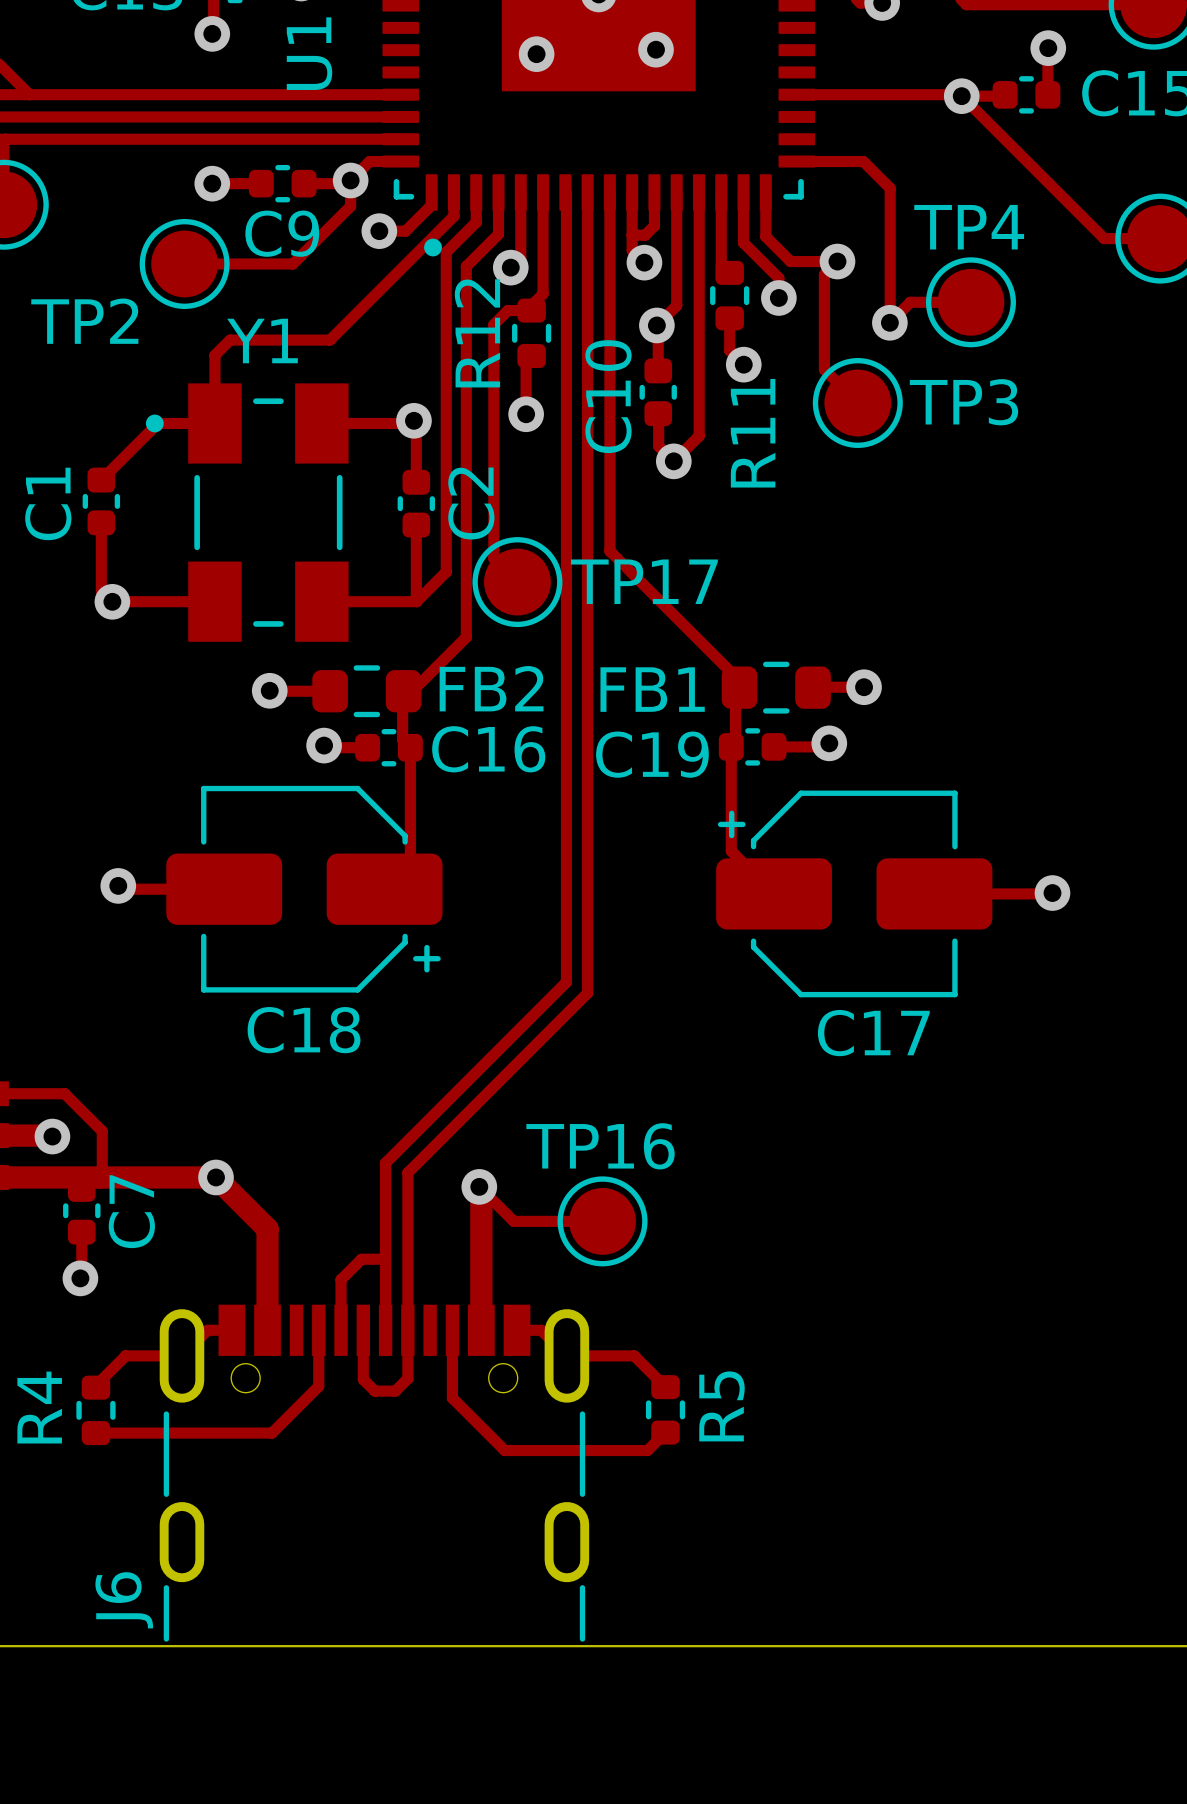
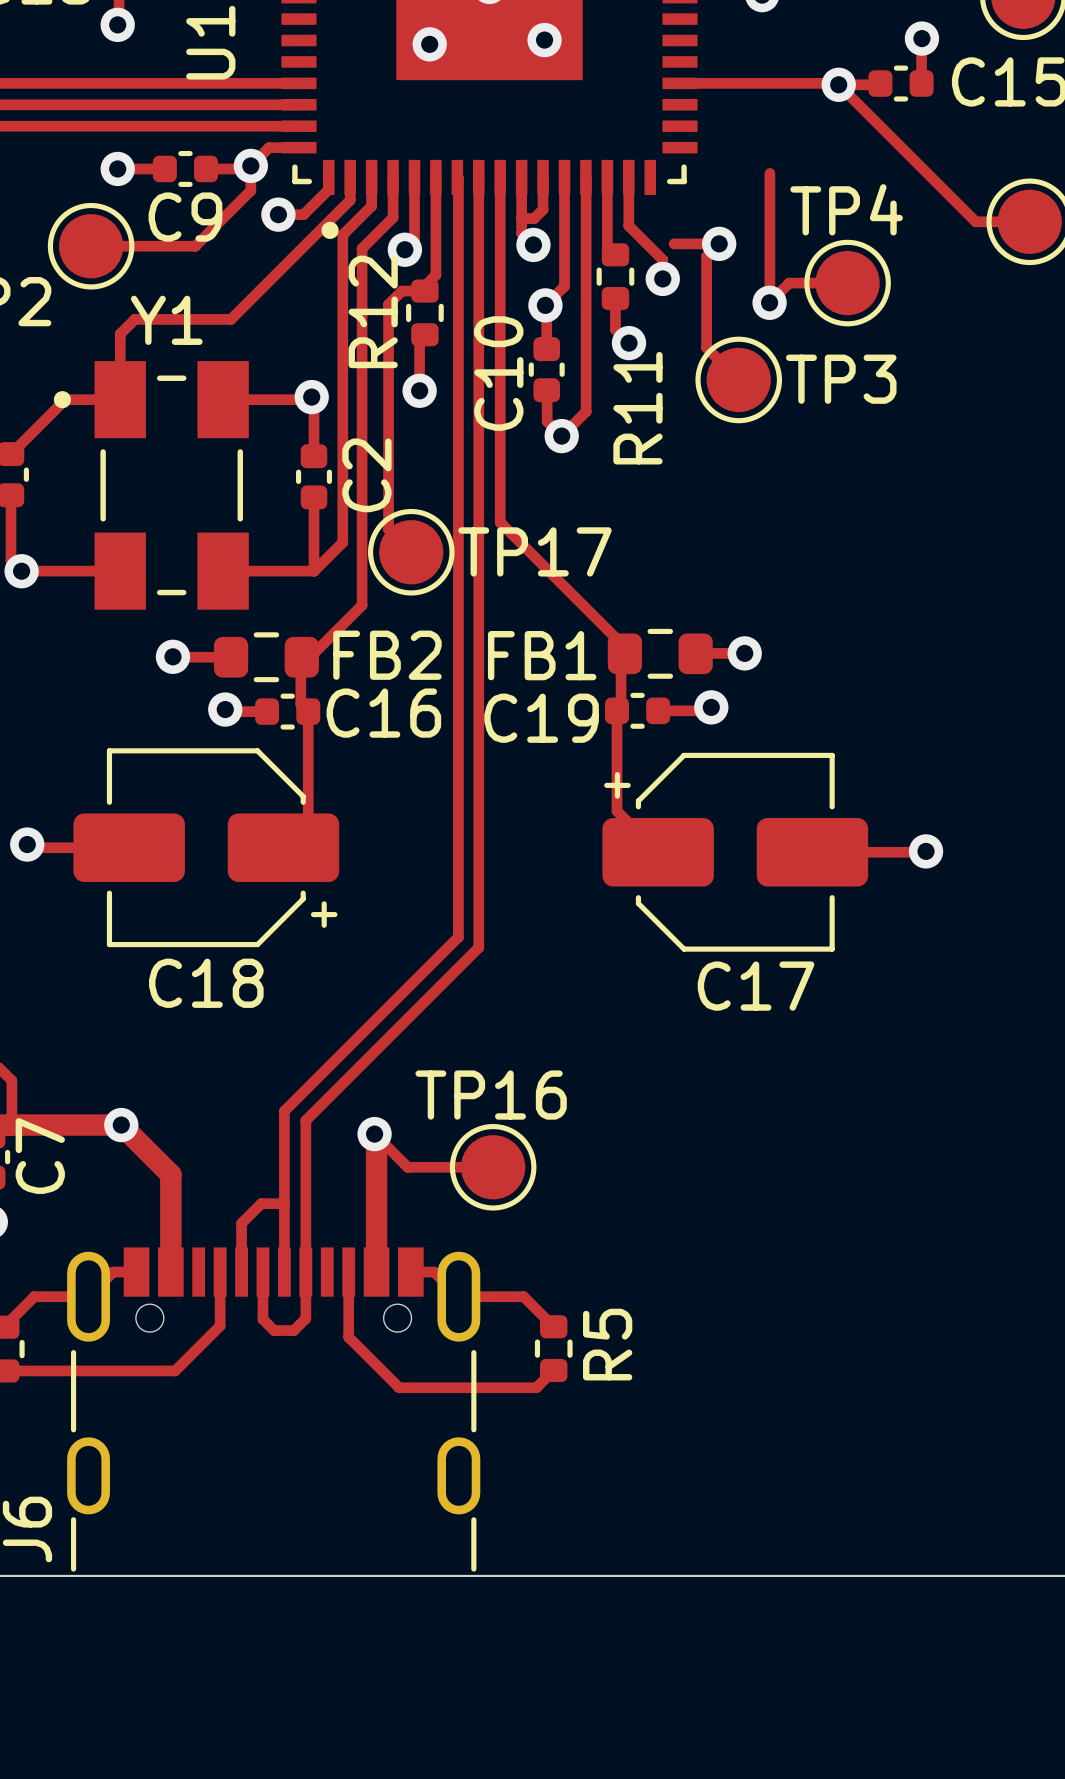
track: (796, 161) (863, 161) (890, 188) -> none
track: (765, 192) (765, 236) (790, 261) -> none

